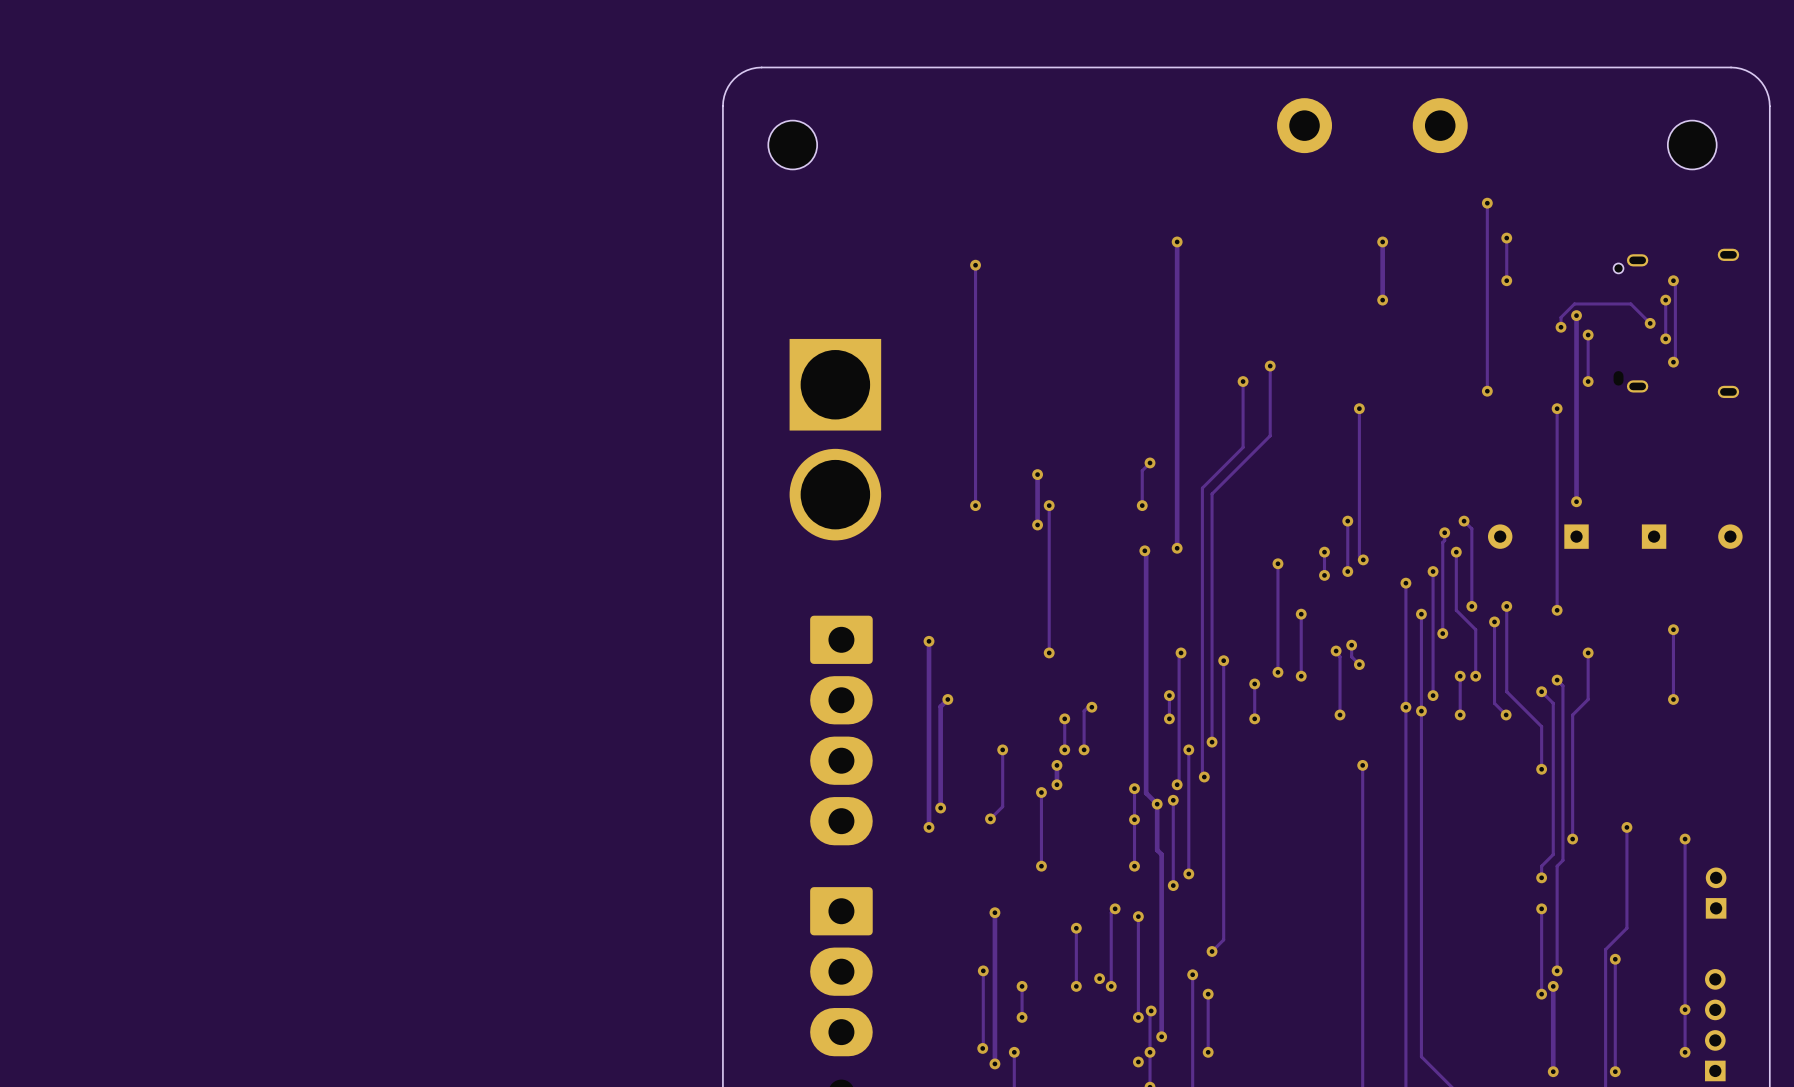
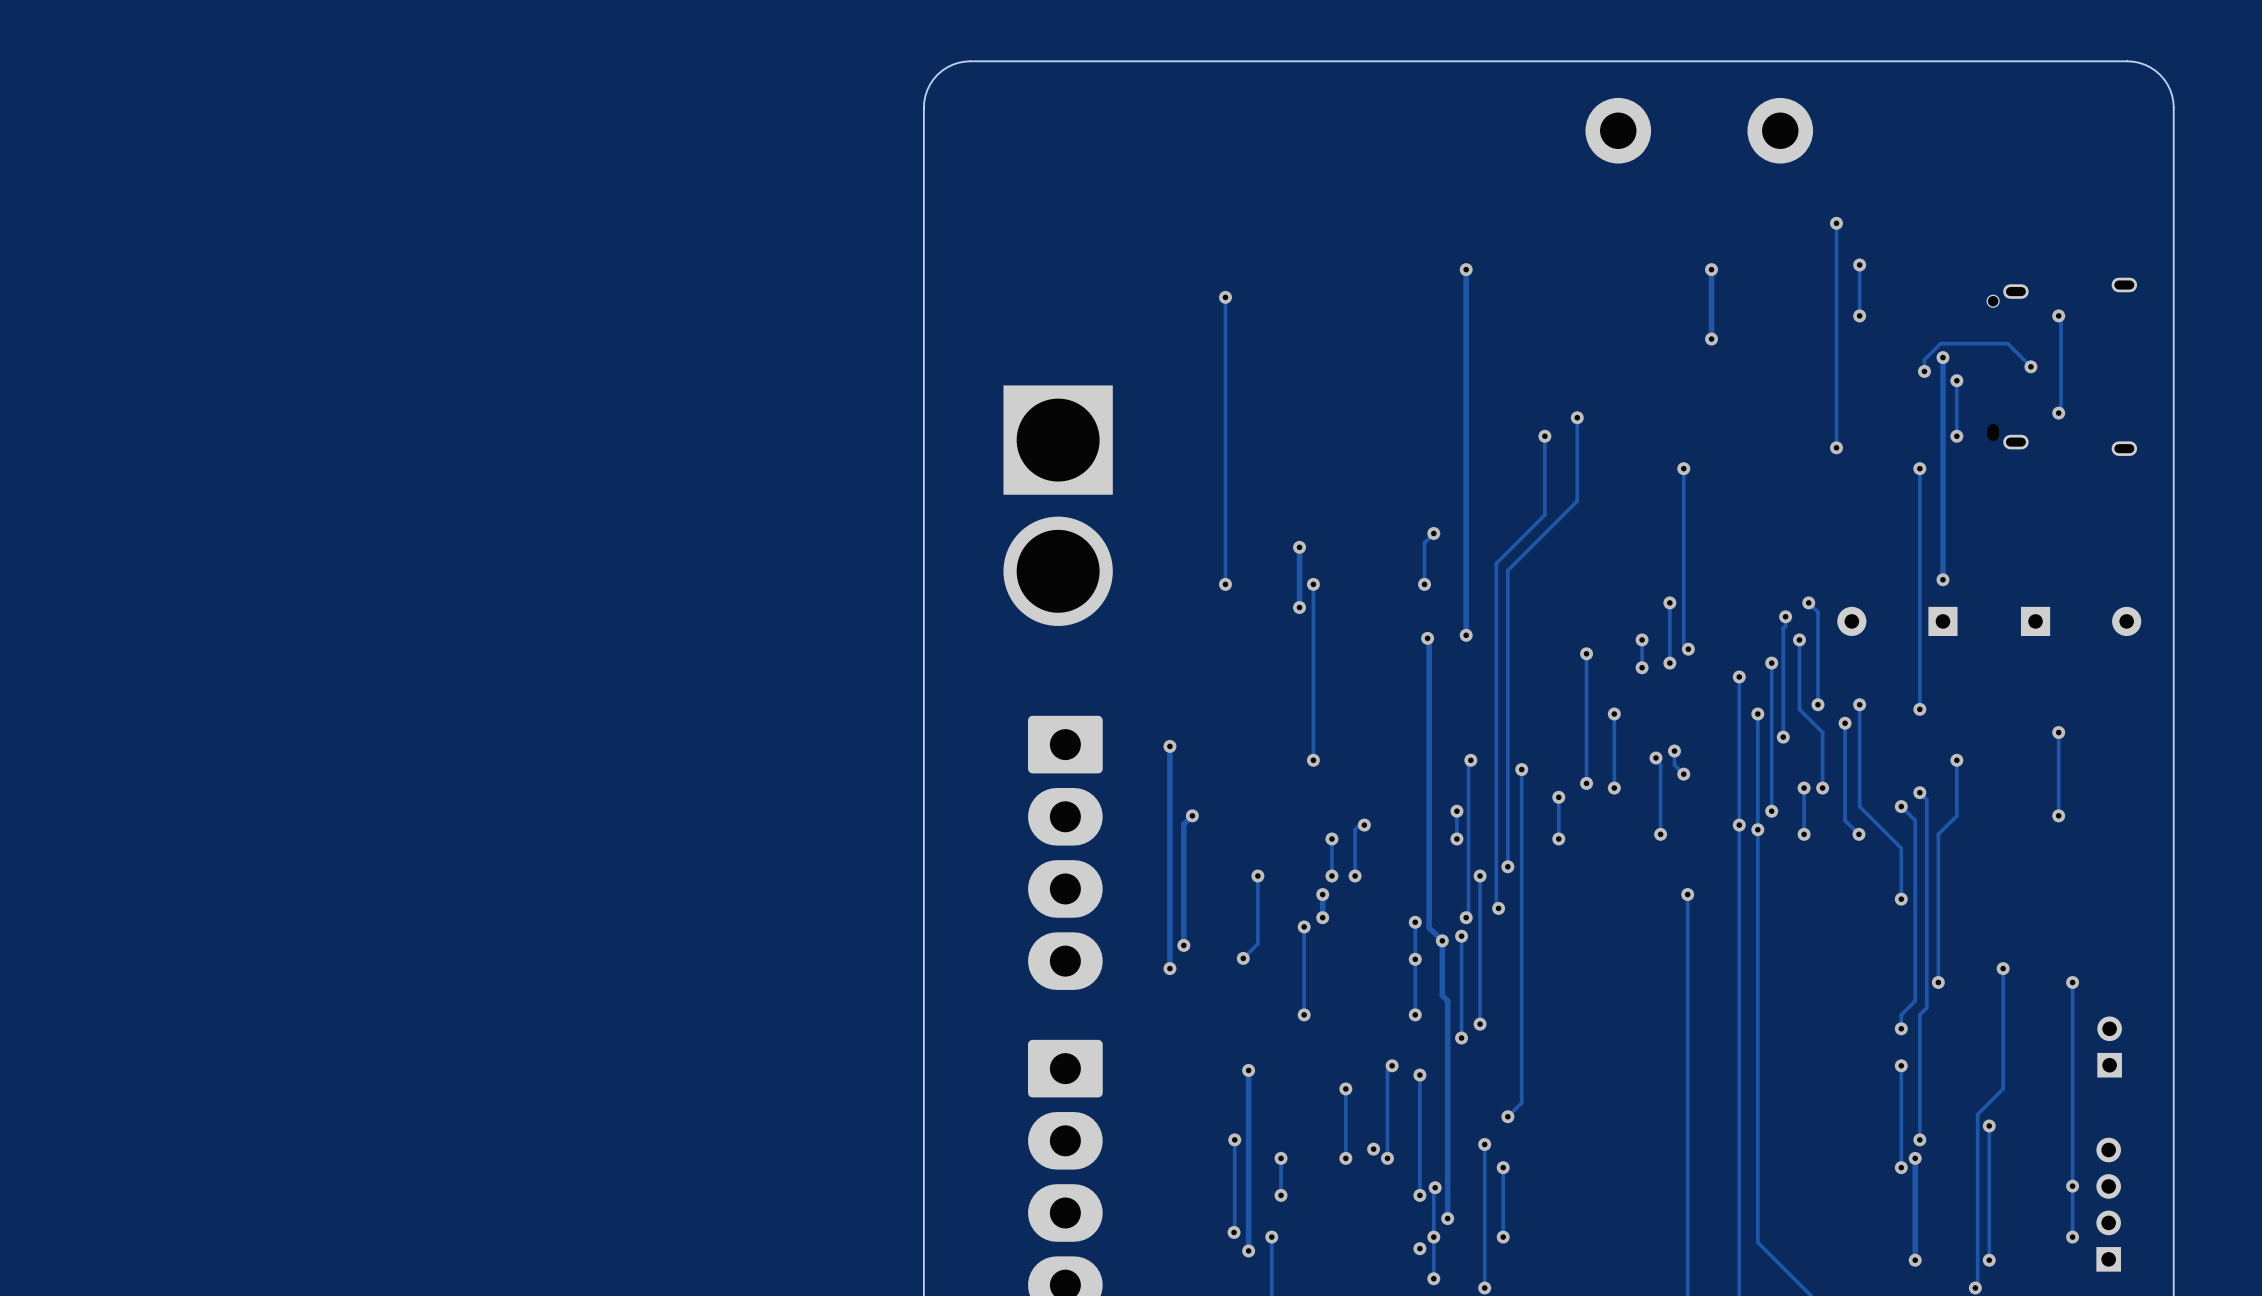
part: (792, 145) -> none
part: (1692, 145) -> none
track: (1665, 300) (1665, 338) -> none
via: (1665, 300) -> none
via: (1665, 338) -> none

